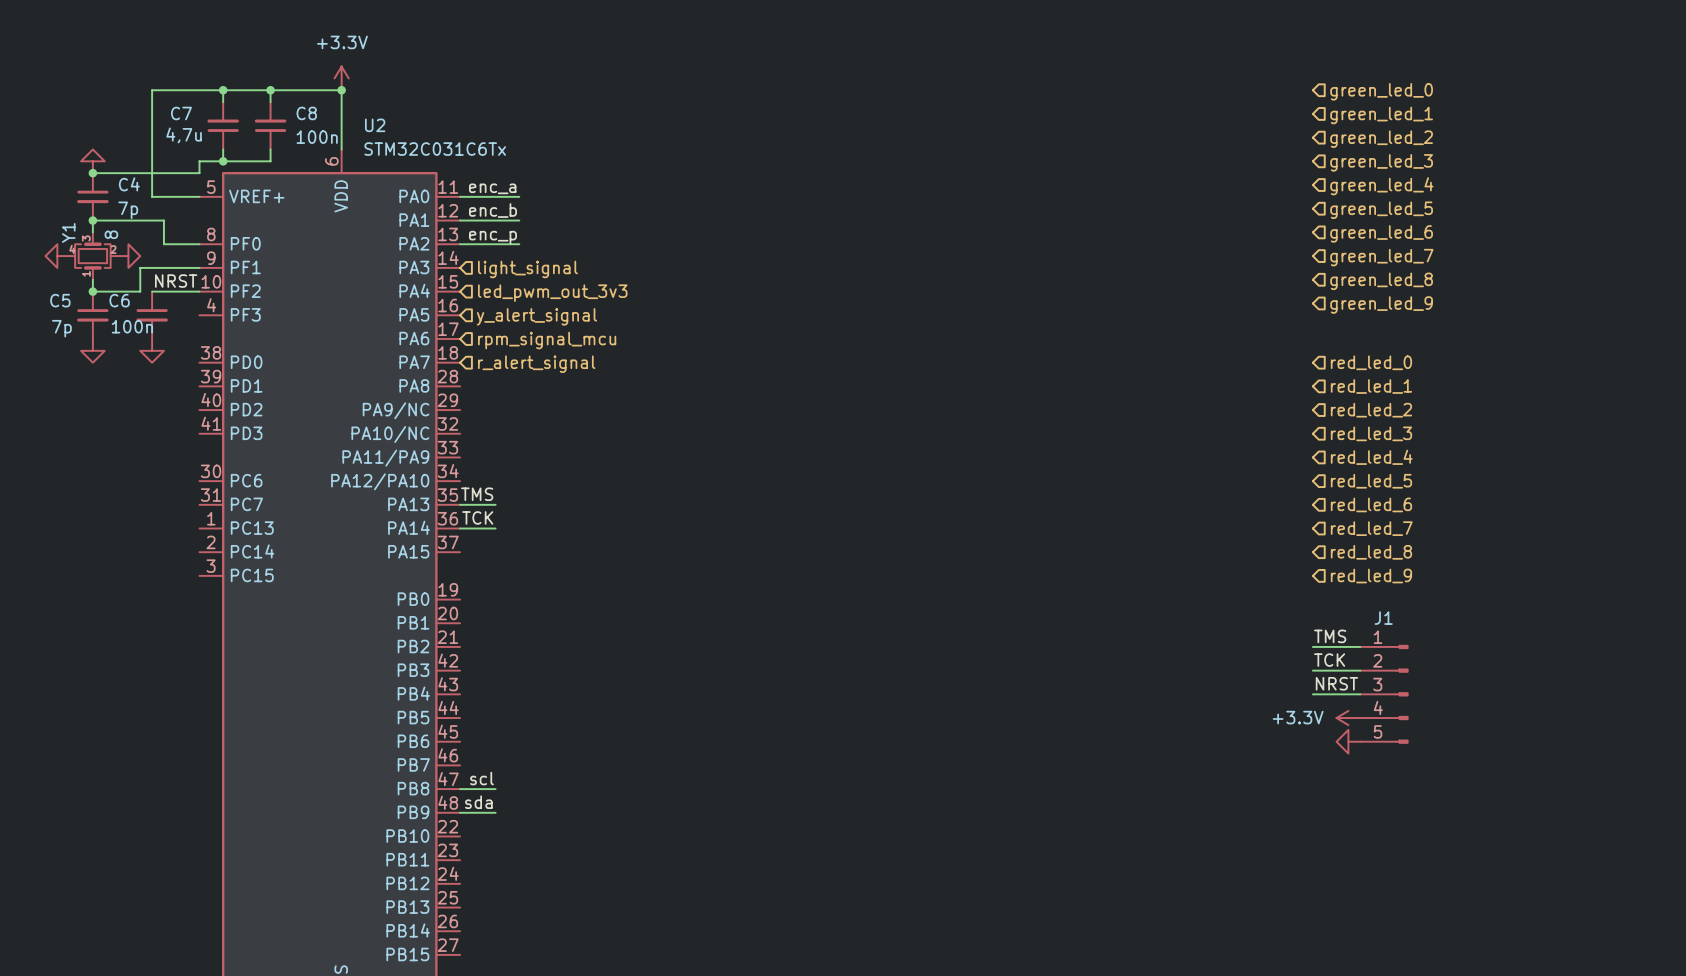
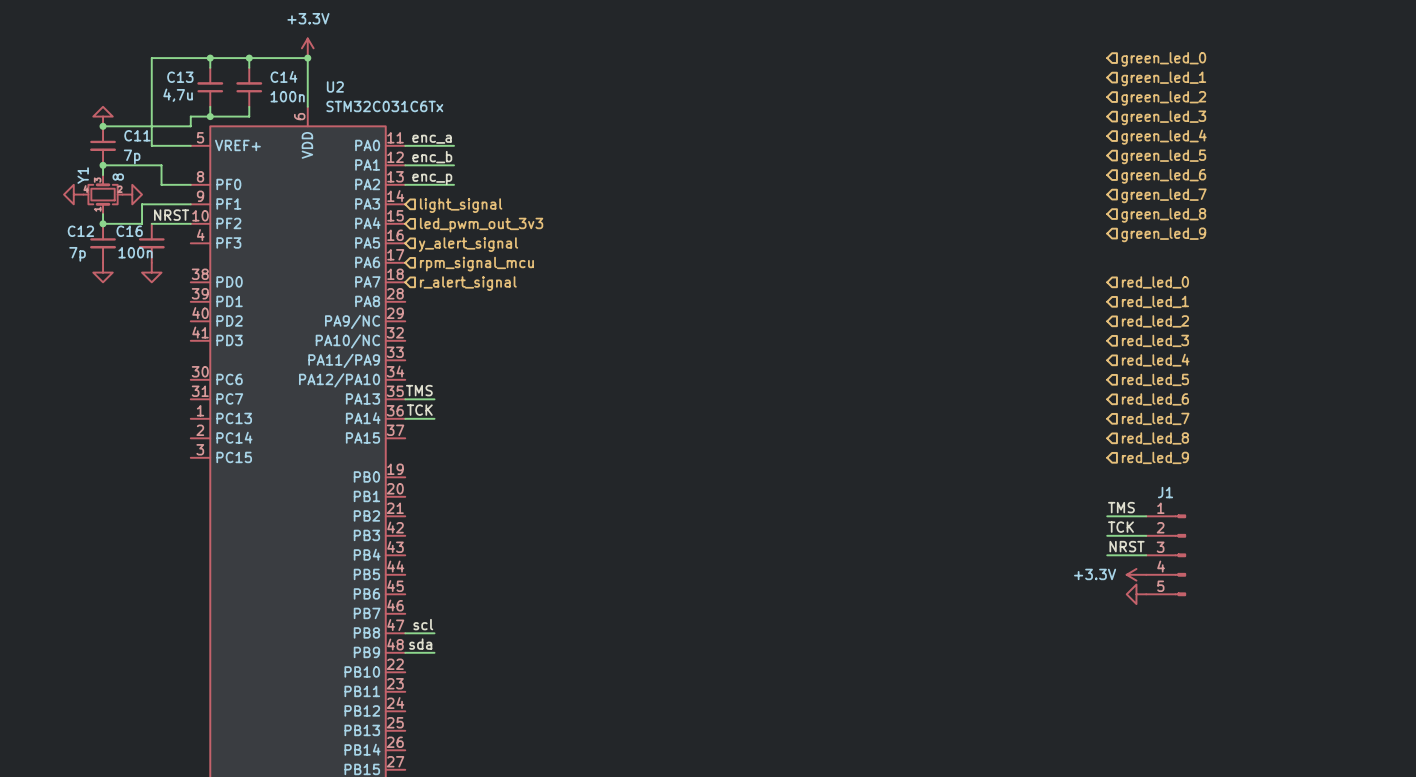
C7 name: C7 (181, 113) -> C13 (180, 77)
C8 name: C8 (306, 113) -> C14 (283, 76)
C4 name: C4 (129, 184) -> C11 (137, 135)
C5 name: C5 (60, 300) -> C12 (80, 231)
C6 name: C6 (119, 300) -> C16 (129, 231)

